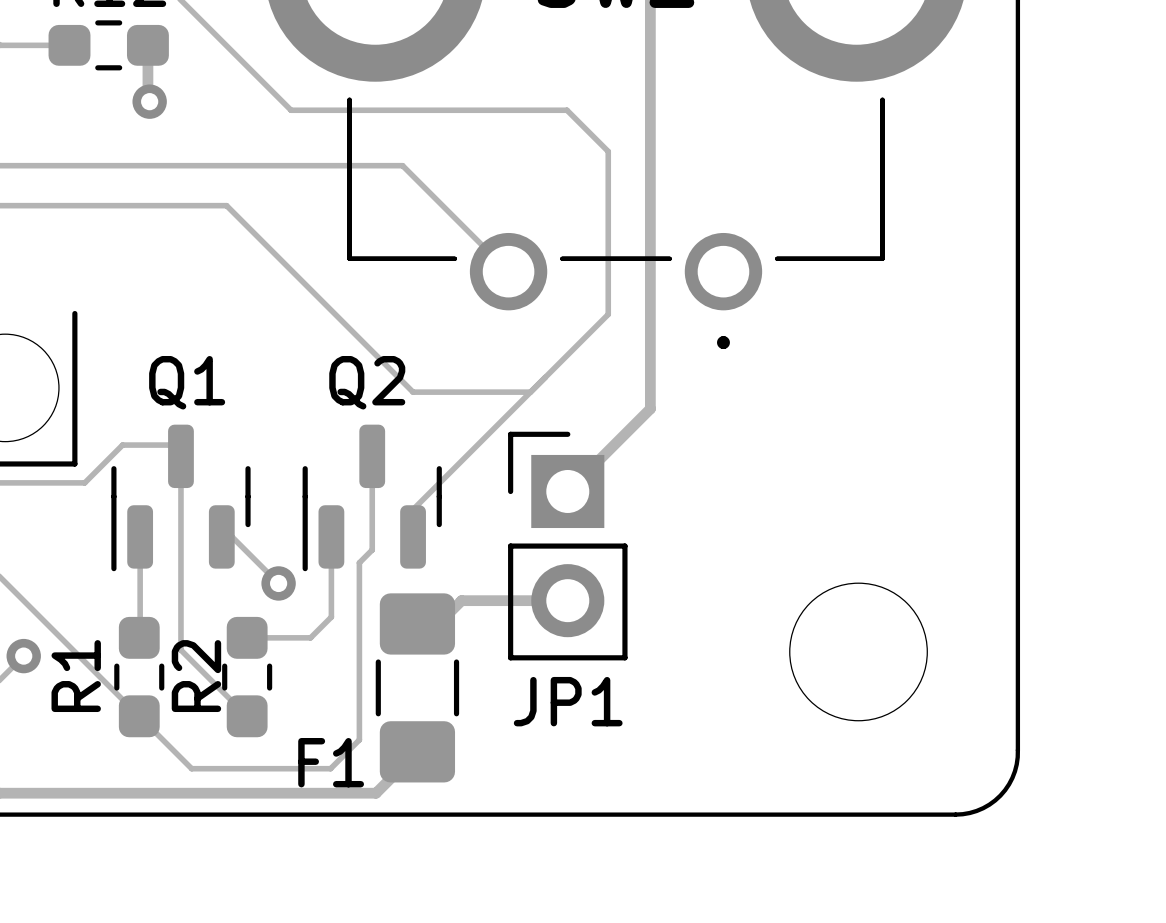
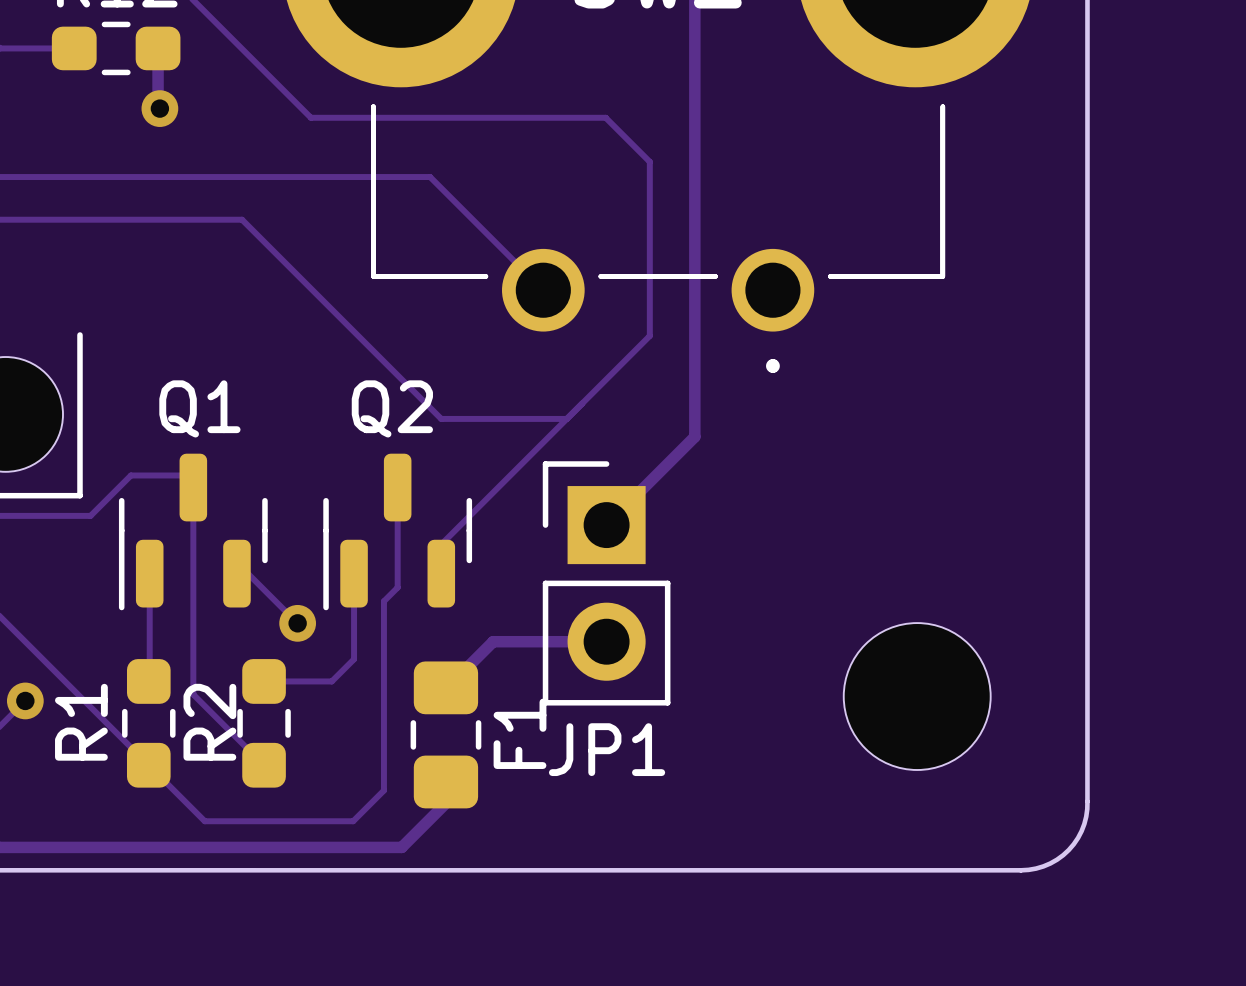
F1 footprint: [375, 593, 460, 783] -> [410, 661, 482, 809]
F1 name rotation: 0° (331, 762) -> 90° counterclockwise (520, 733)
F1 name position: F1 (331, 762) -> F1 (520, 733)

